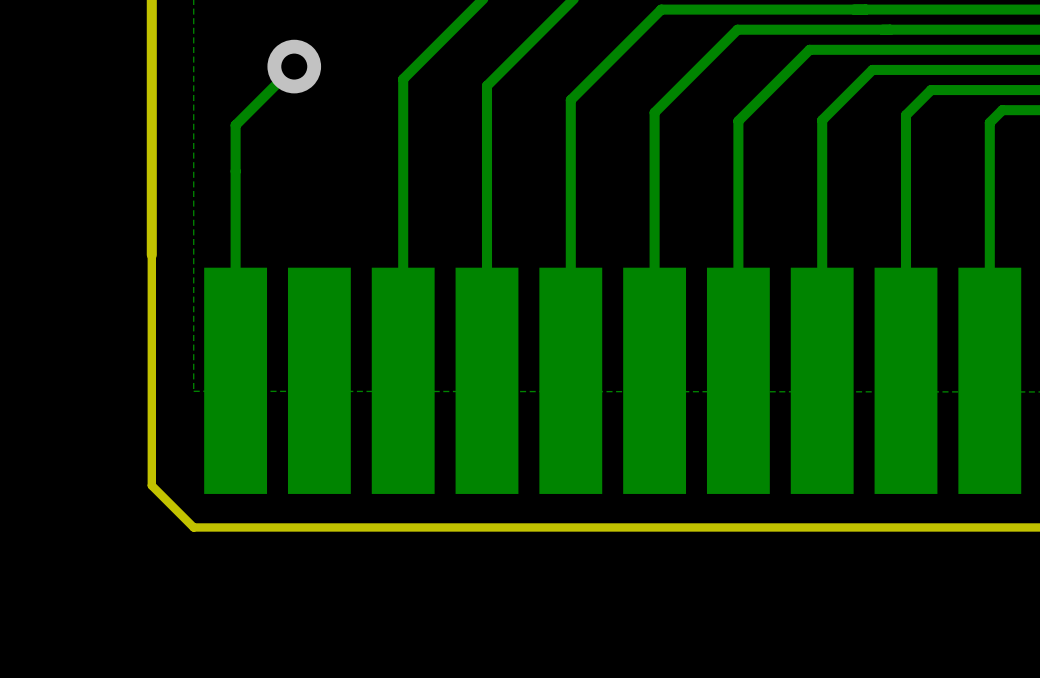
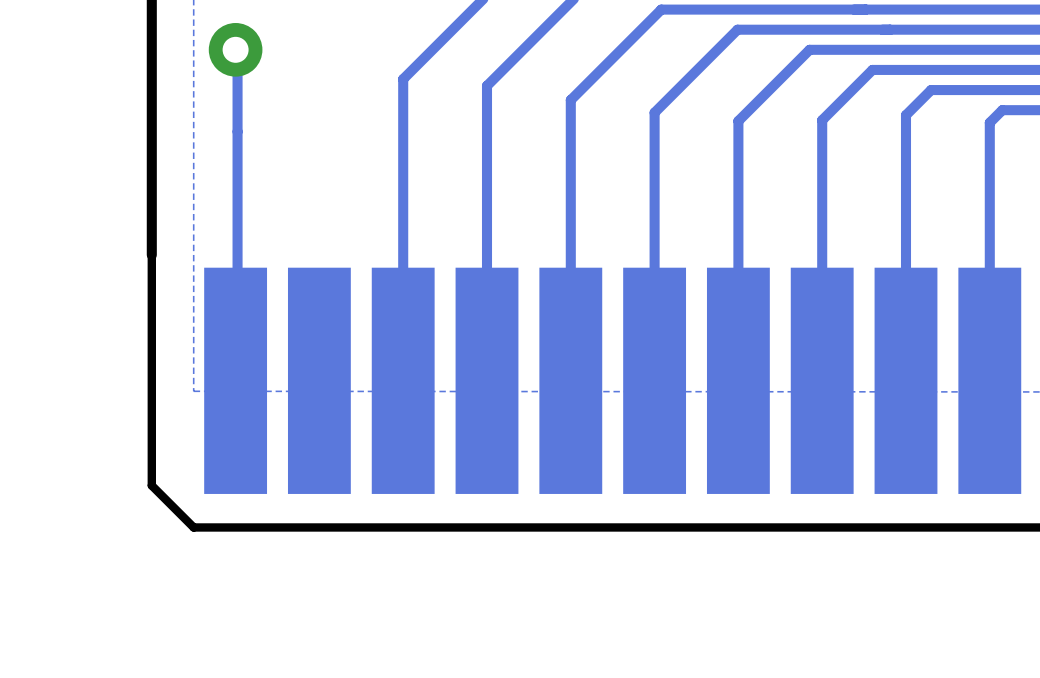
track: none -> (235, 49) (237, 51) (237, 379)
track: (294, 66) (235, 125) (235, 380) -> none
via position: (294, 66) -> (235, 49)

